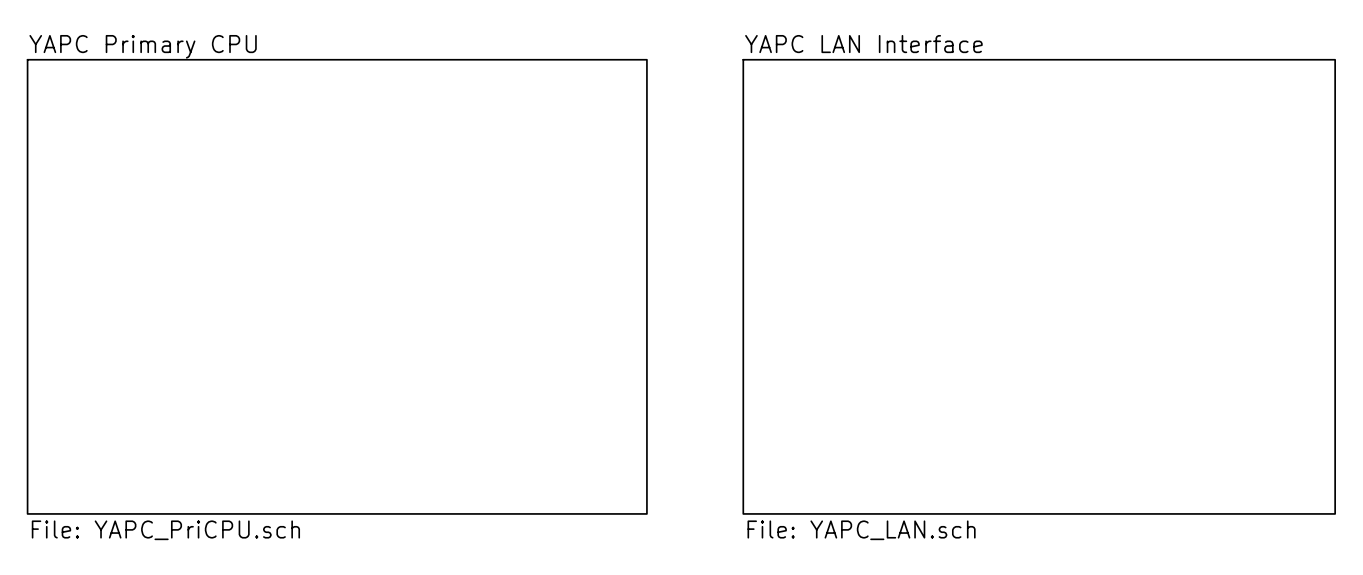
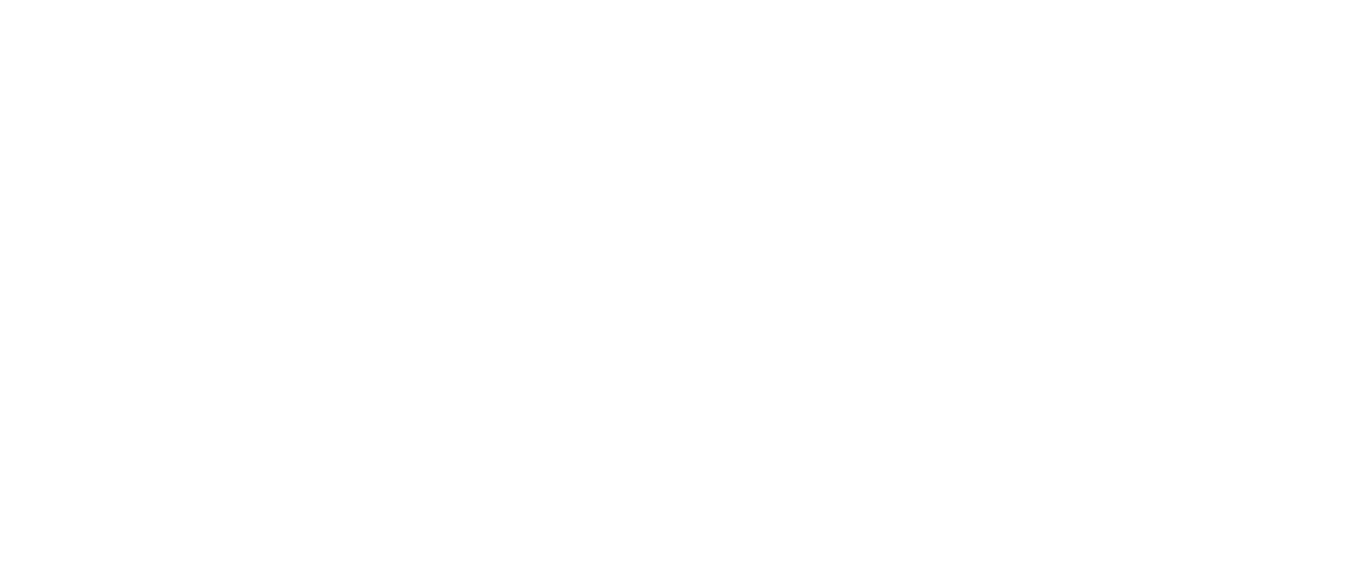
sheet YAPC Primary CPU: File: YAPC_PriCPU.sch (337, 286) -> none
sheet YAPC LAN Interface: File: YAPC_LAN.sch (1039, 286) -> none

